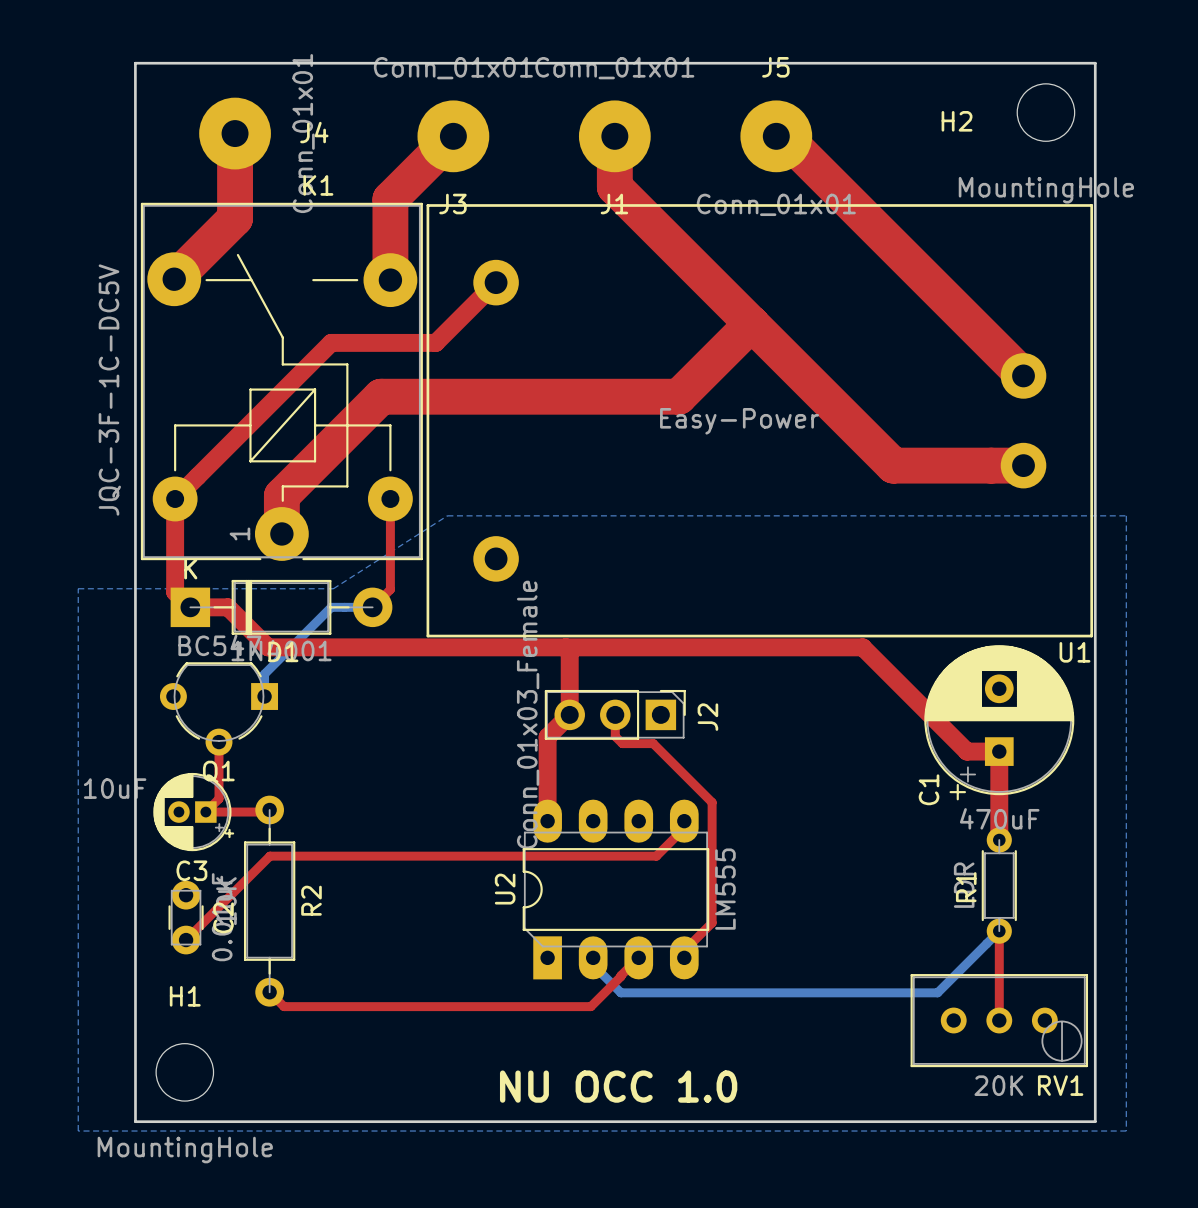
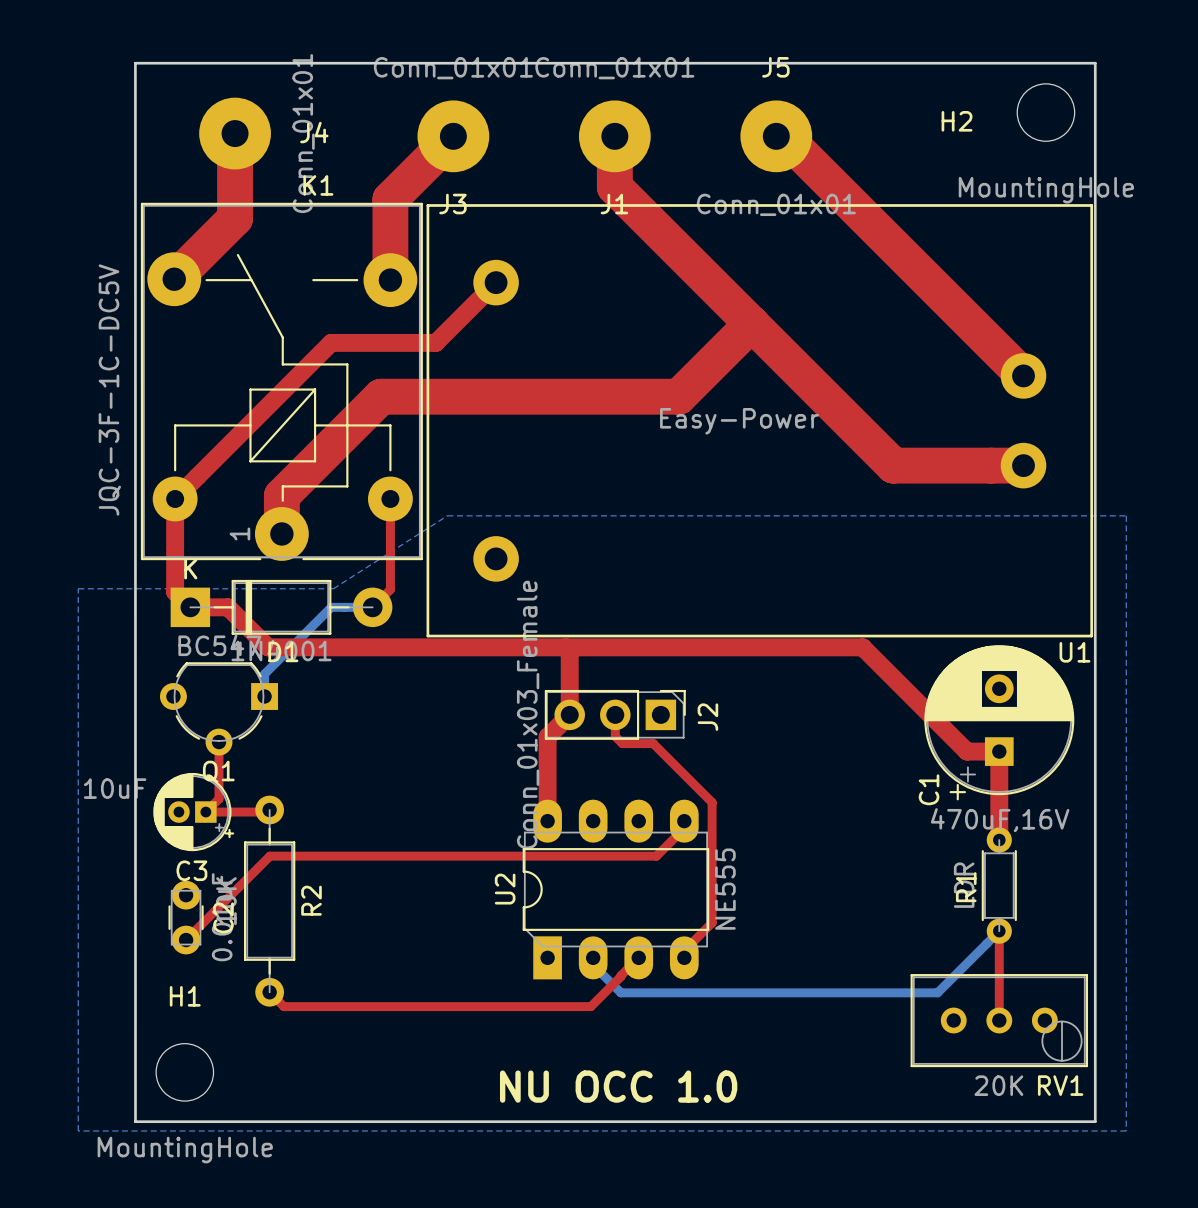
C1 value: 470uF (999, 818) -> 470uF,16V (1000, 820)
U2 value: LM555 (725, 889) -> NE555 (725, 889)

